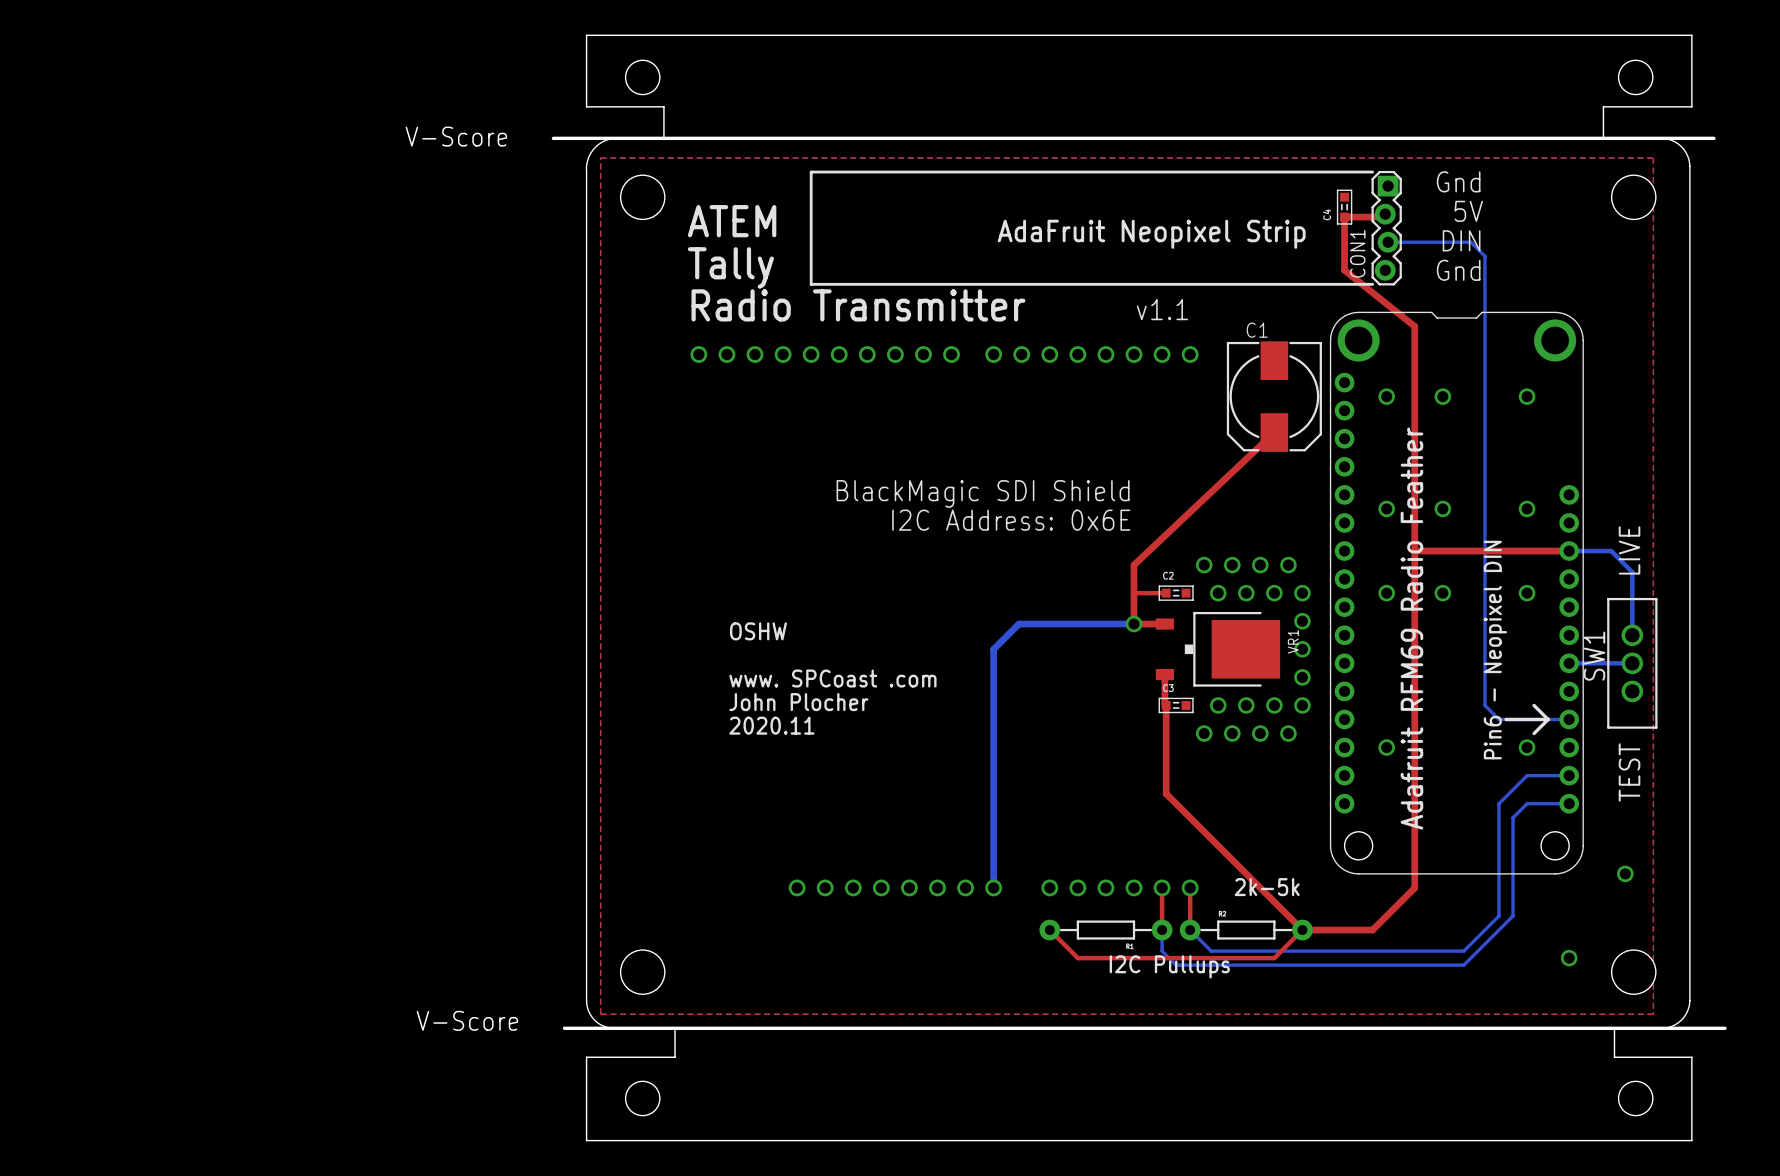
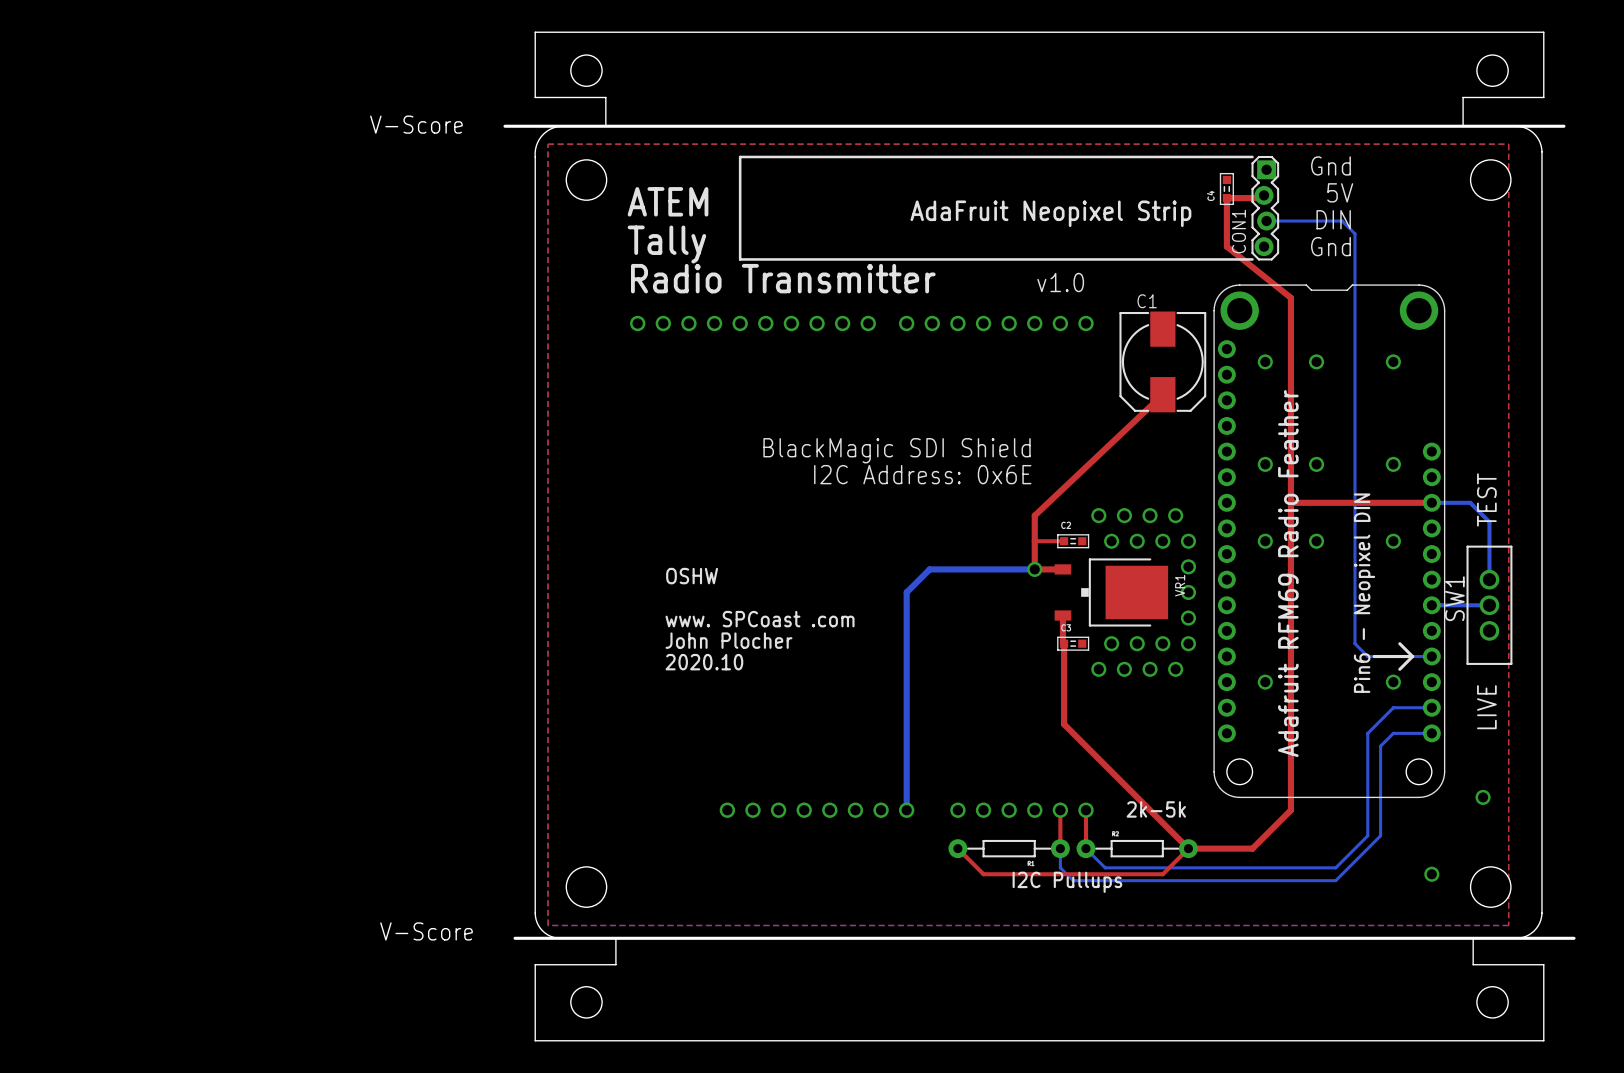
text: v1.1 (1162, 309) -> v1.0 (1060, 282)
text: LIVE (1629, 550) -> TEST (1486, 499)
text: 2020.11 (771, 725) -> 2020.10 (704, 662)
text: TEST (1629, 772) -> LIVE (1486, 707)

